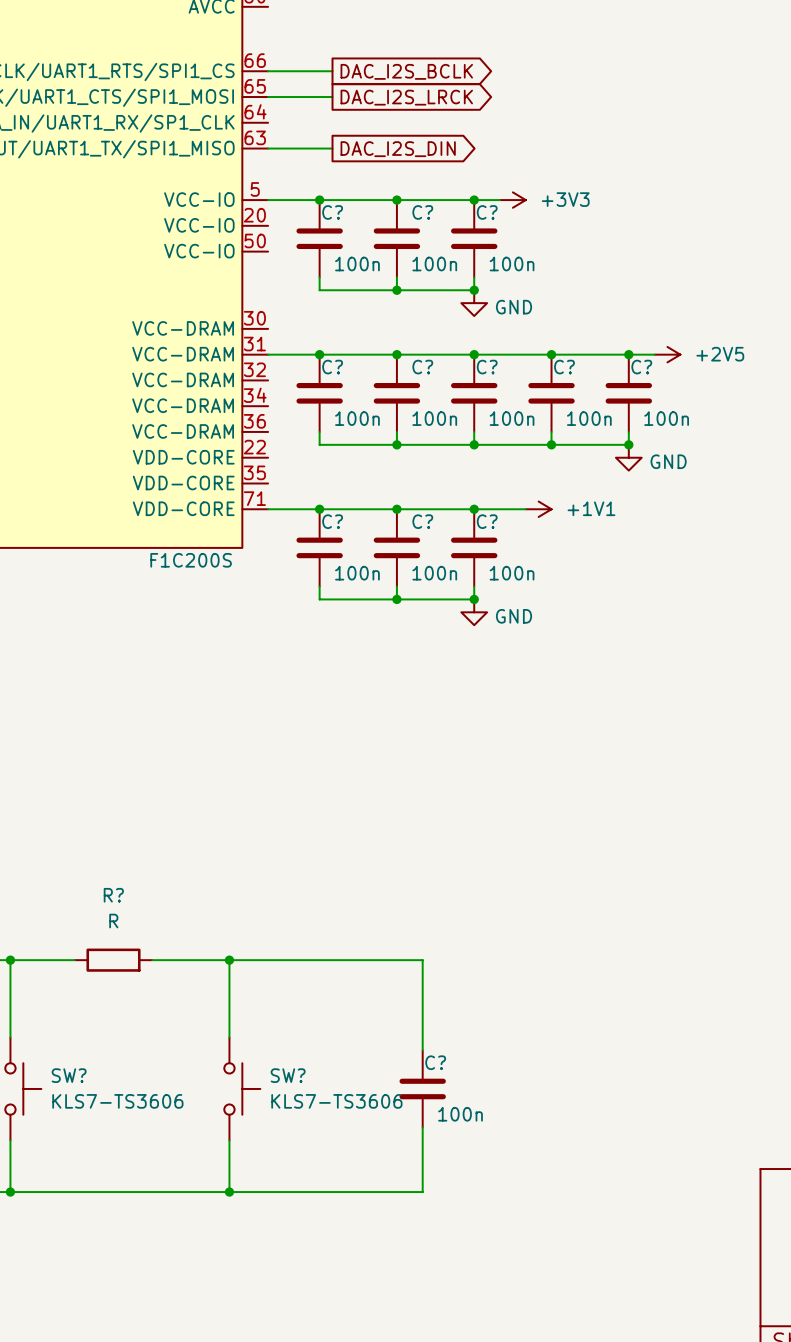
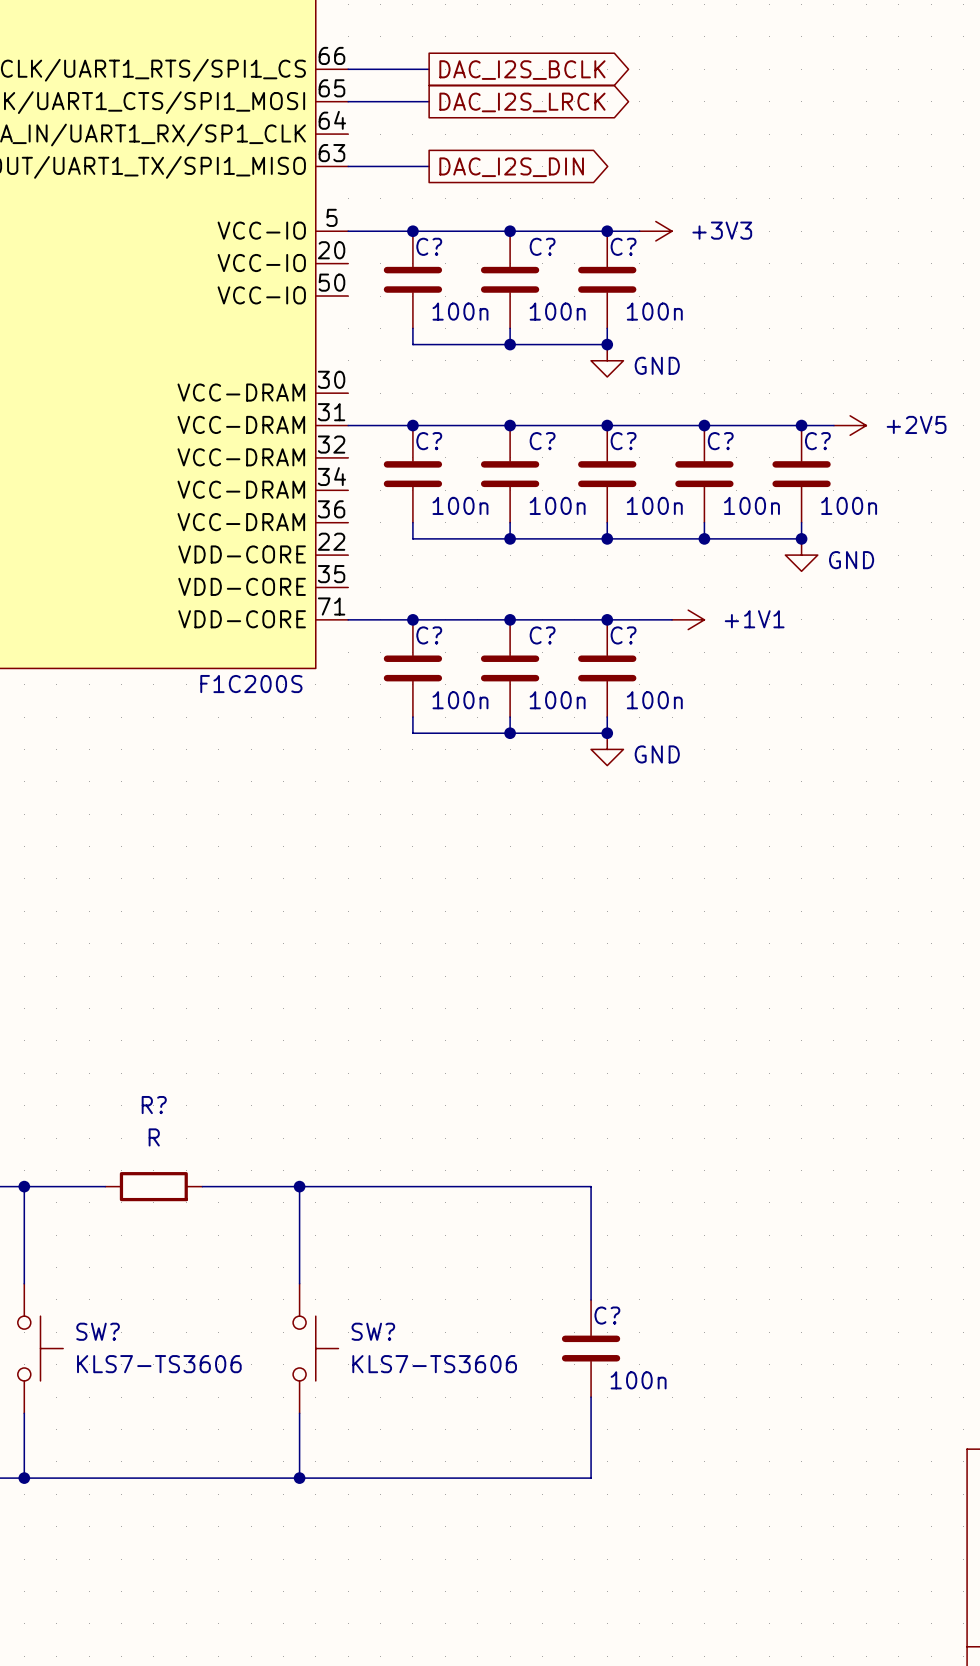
wire: (422, 960) (422, 1050) -> (542, 1186) (591, 1186) (591, 1299)
C? position: (422, 1088) -> (591, 1348)
wire: (422, 1127) (422, 1192) -> (591, 1397) (591, 1478) (542, 1478)

